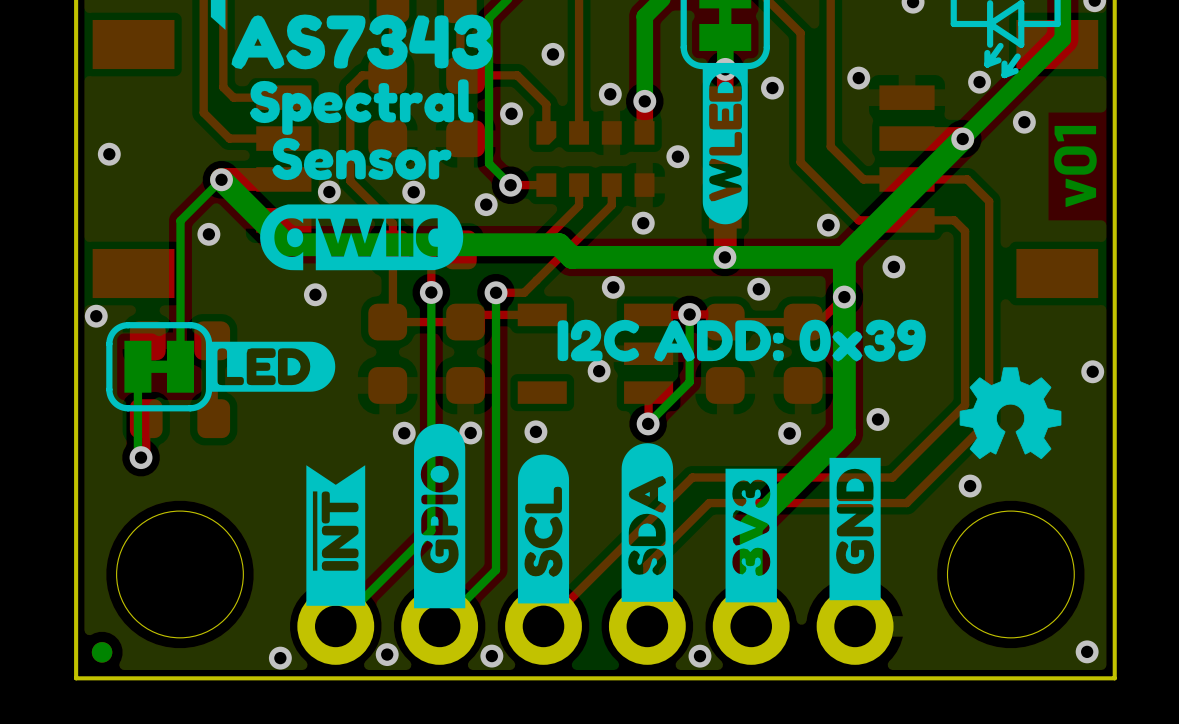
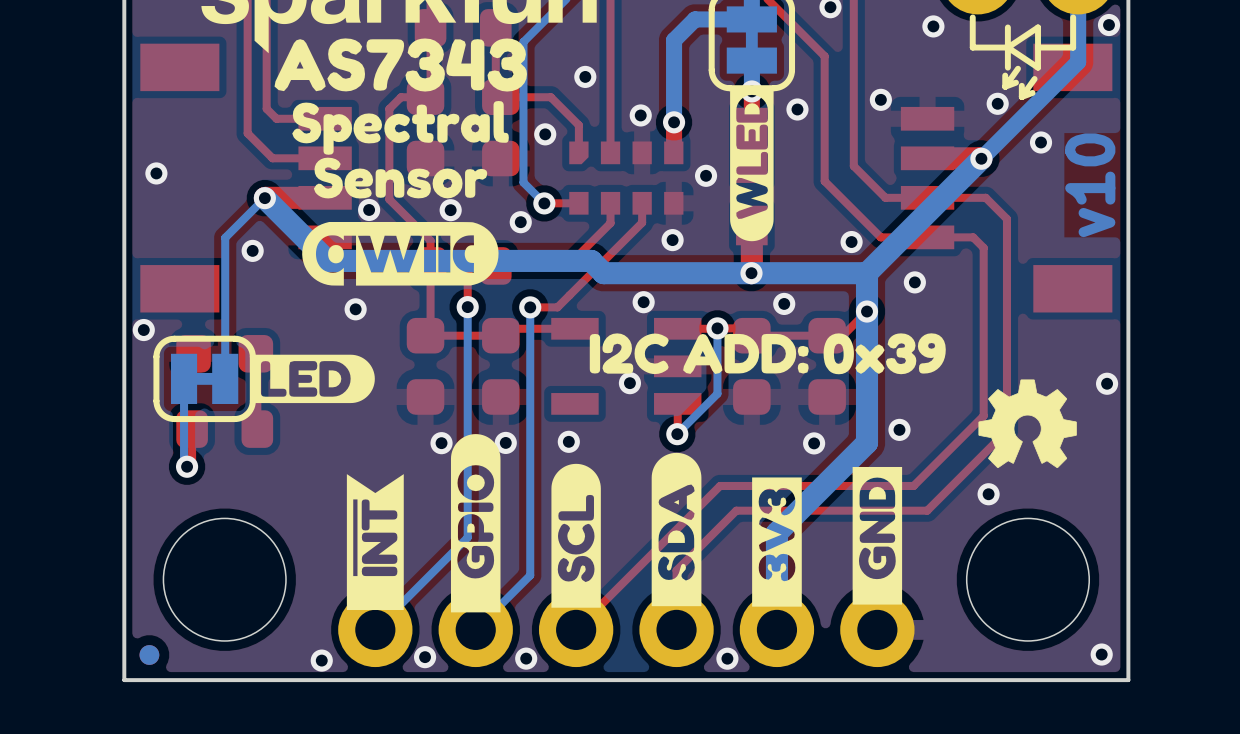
text: v01 (1075, 166) -> v10 (1090, 185)

